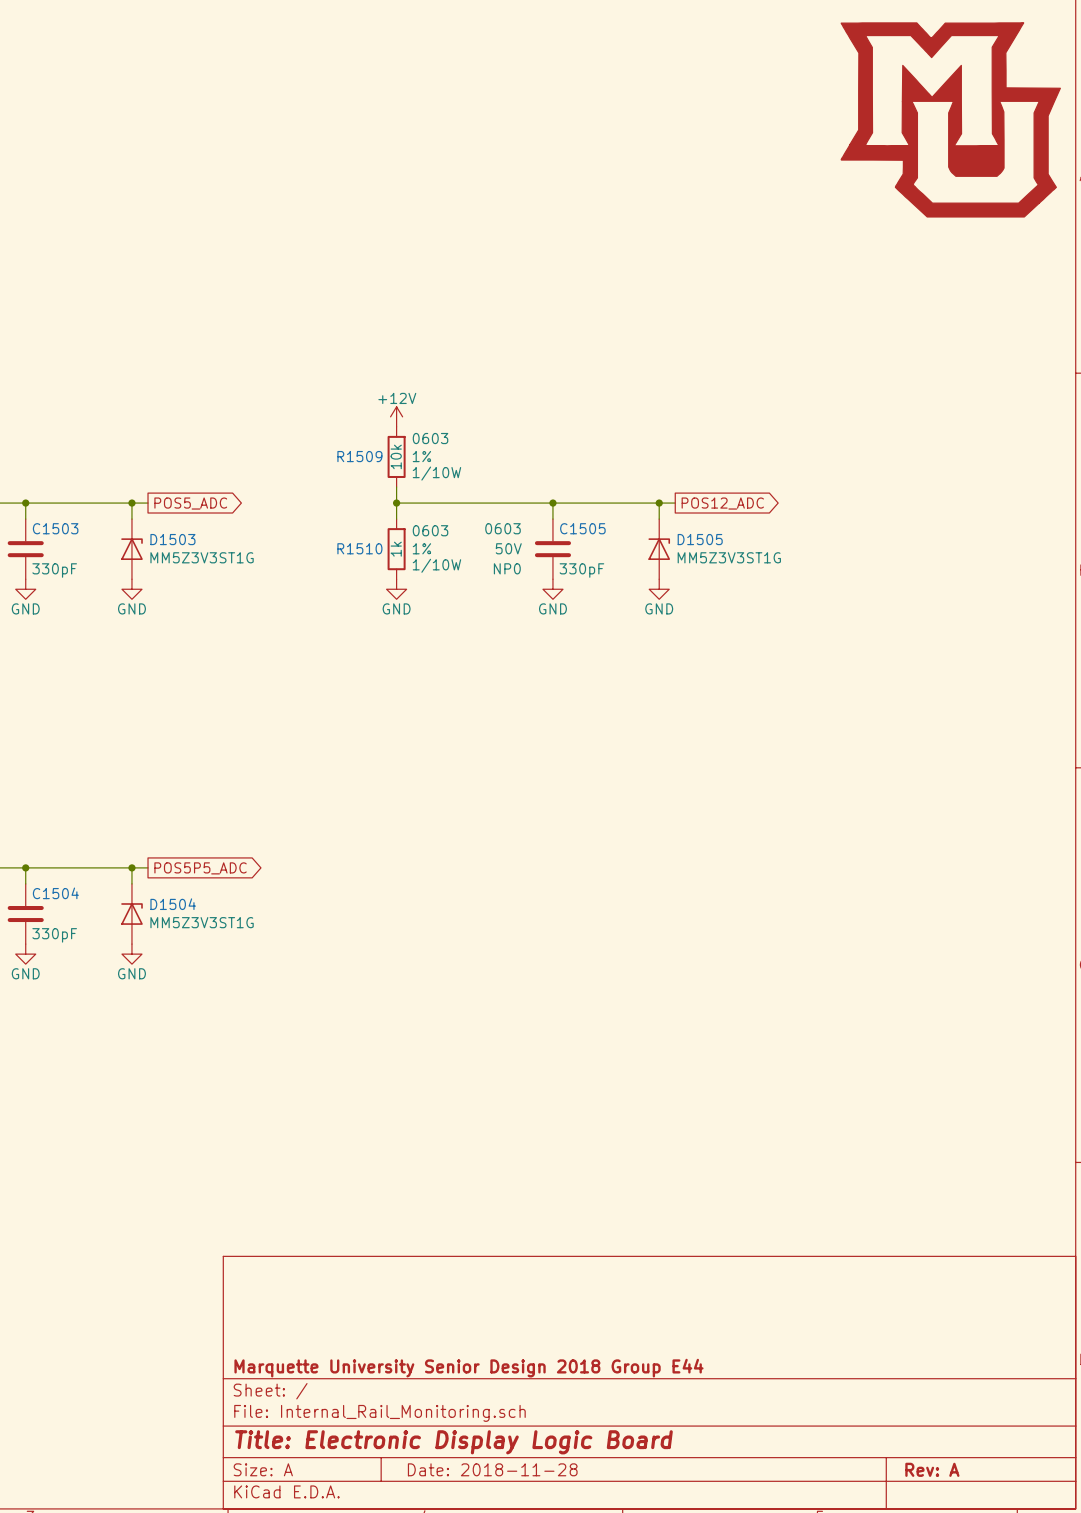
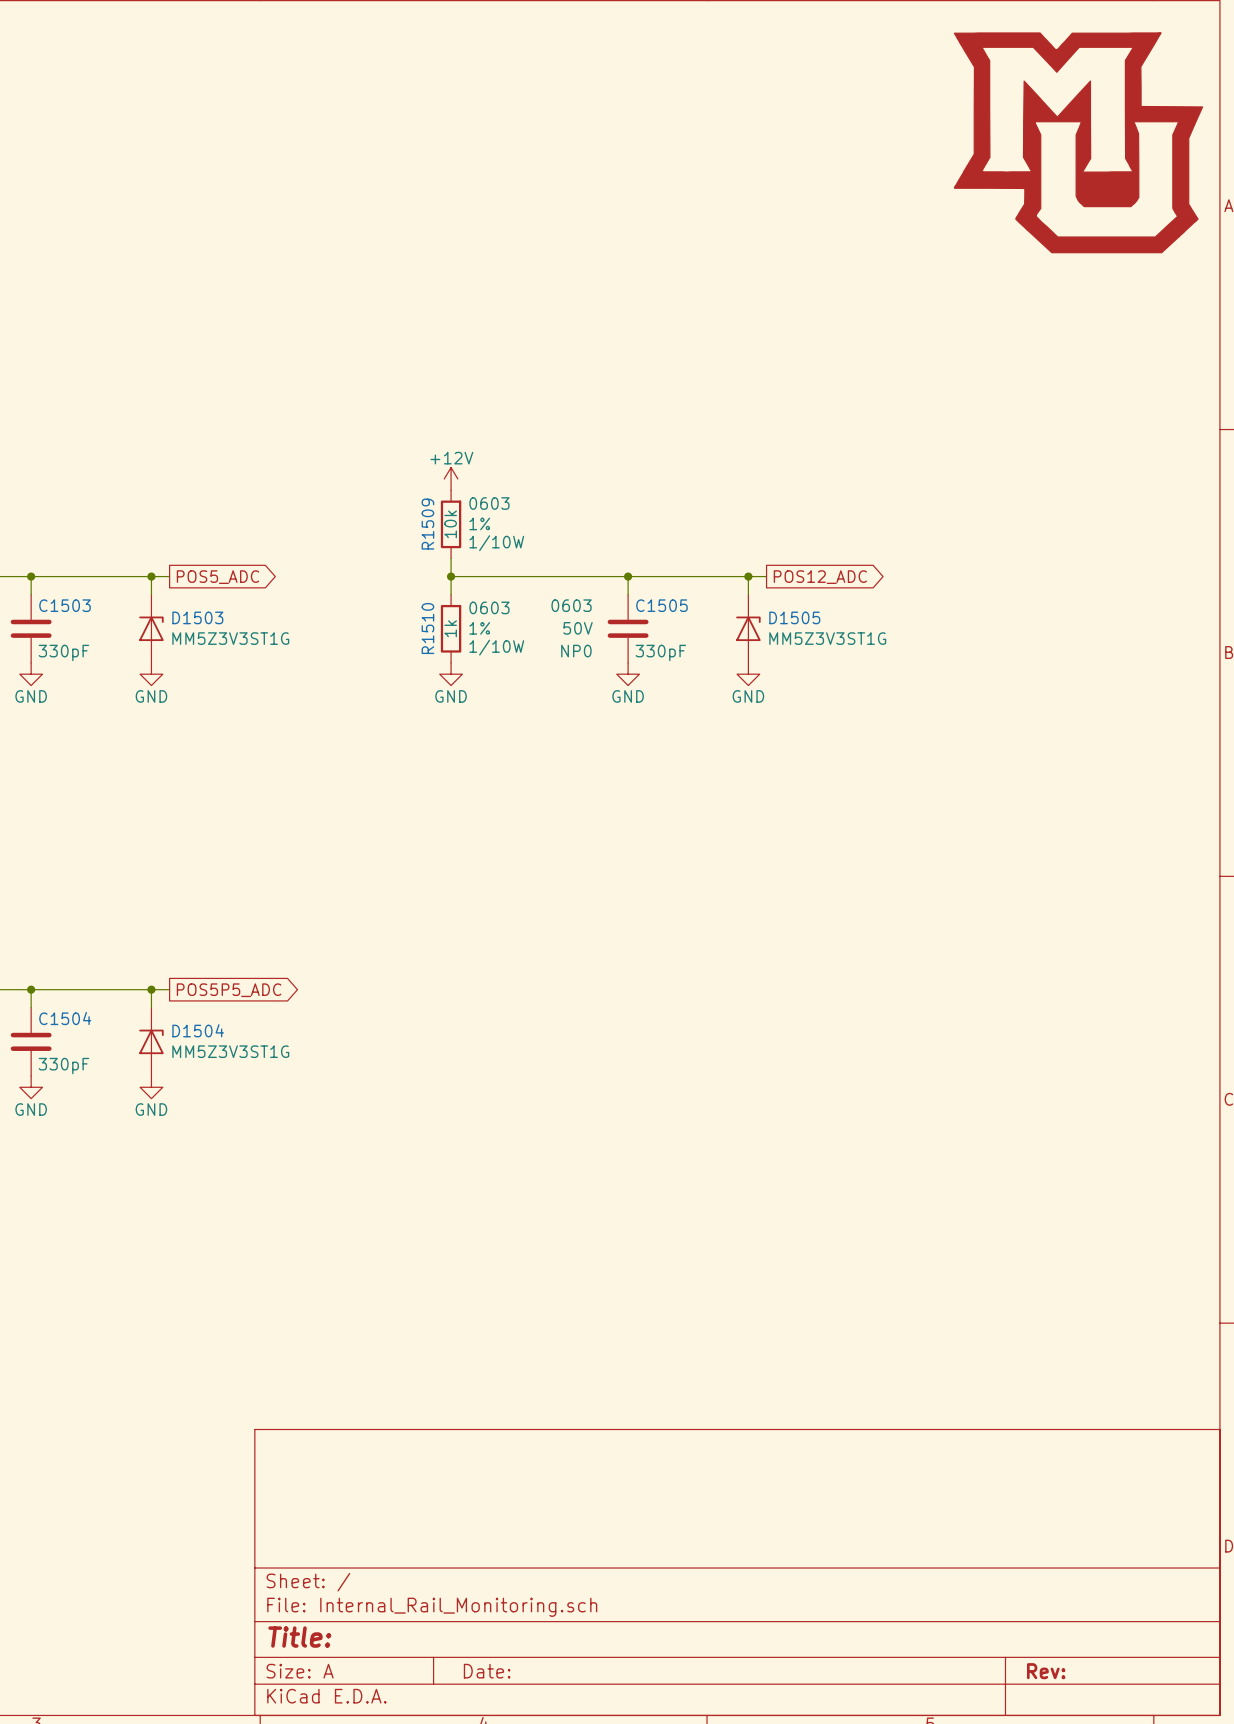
R1509 name rotation: 0° (359, 456) -> 90° counterclockwise (427, 524)
R1510 name rotation: 0° (359, 548) -> 90° counterclockwise (427, 628)
title block: Marquette University Senior Design 2018 Group E44 (468, 1368) -> none
title block: Title: Electronic Display Logic Board (453, 1442) -> Title: (299, 1637)
title block: Date: 2018-11-28 (492, 1469) -> Date: (487, 1671)
title block: Rev: A (932, 1469) -> Rev: (1046, 1671)

